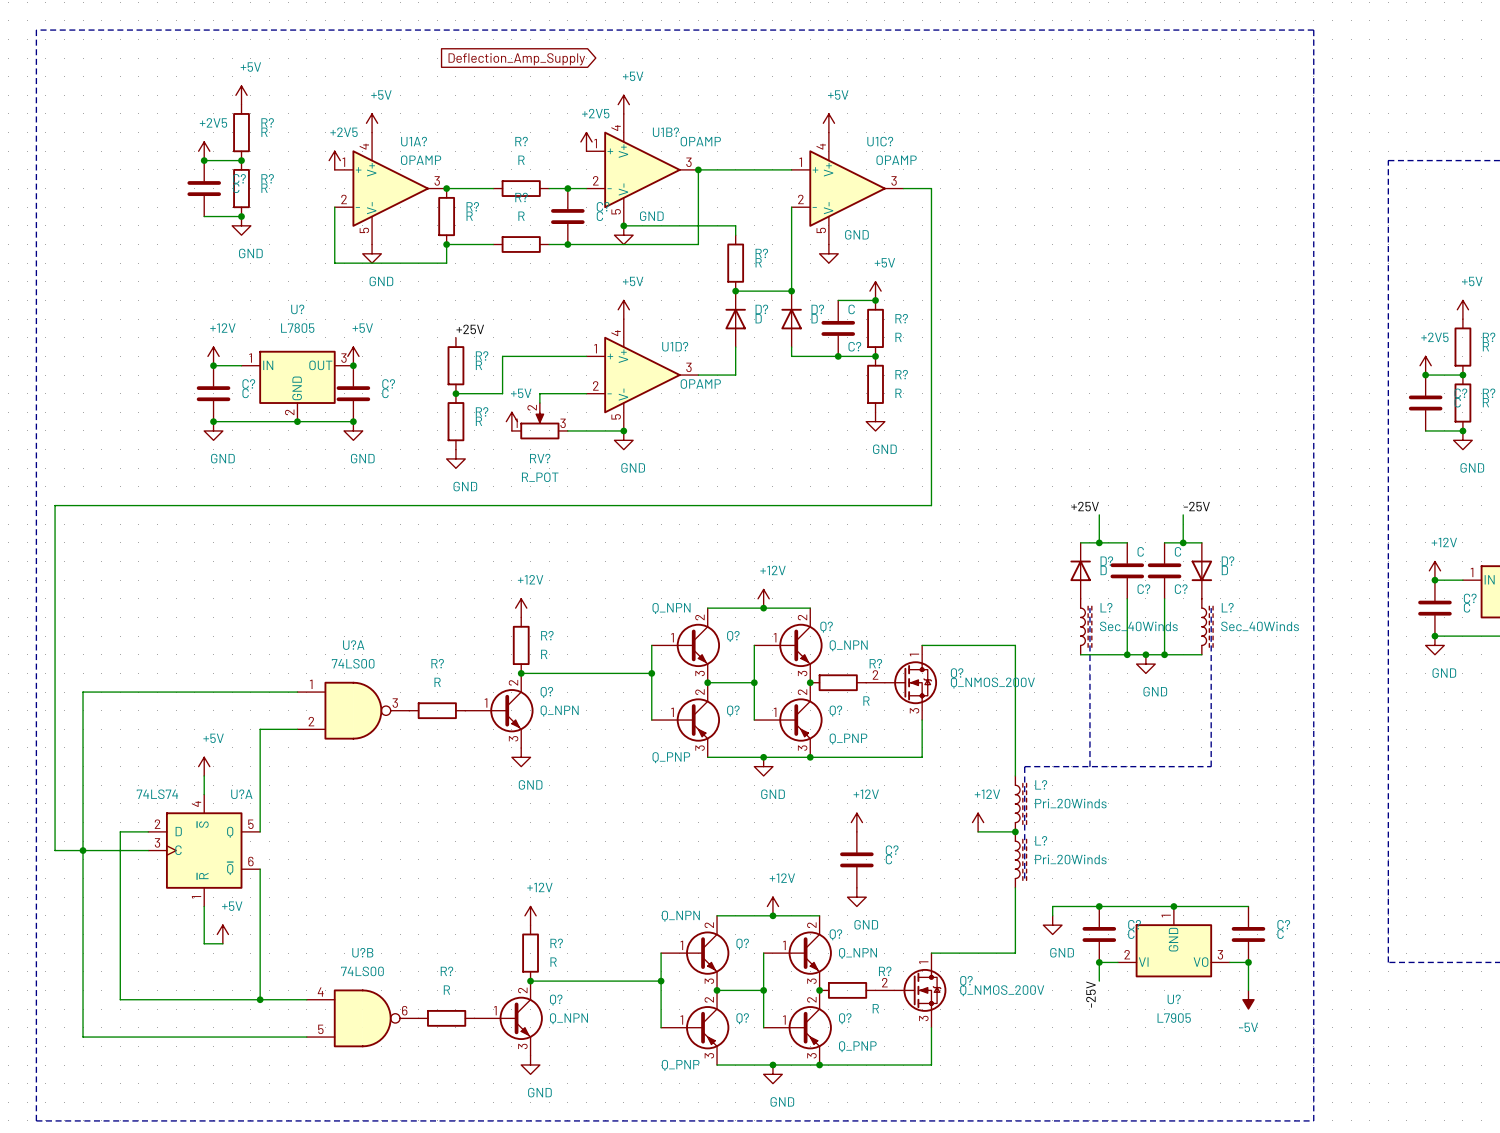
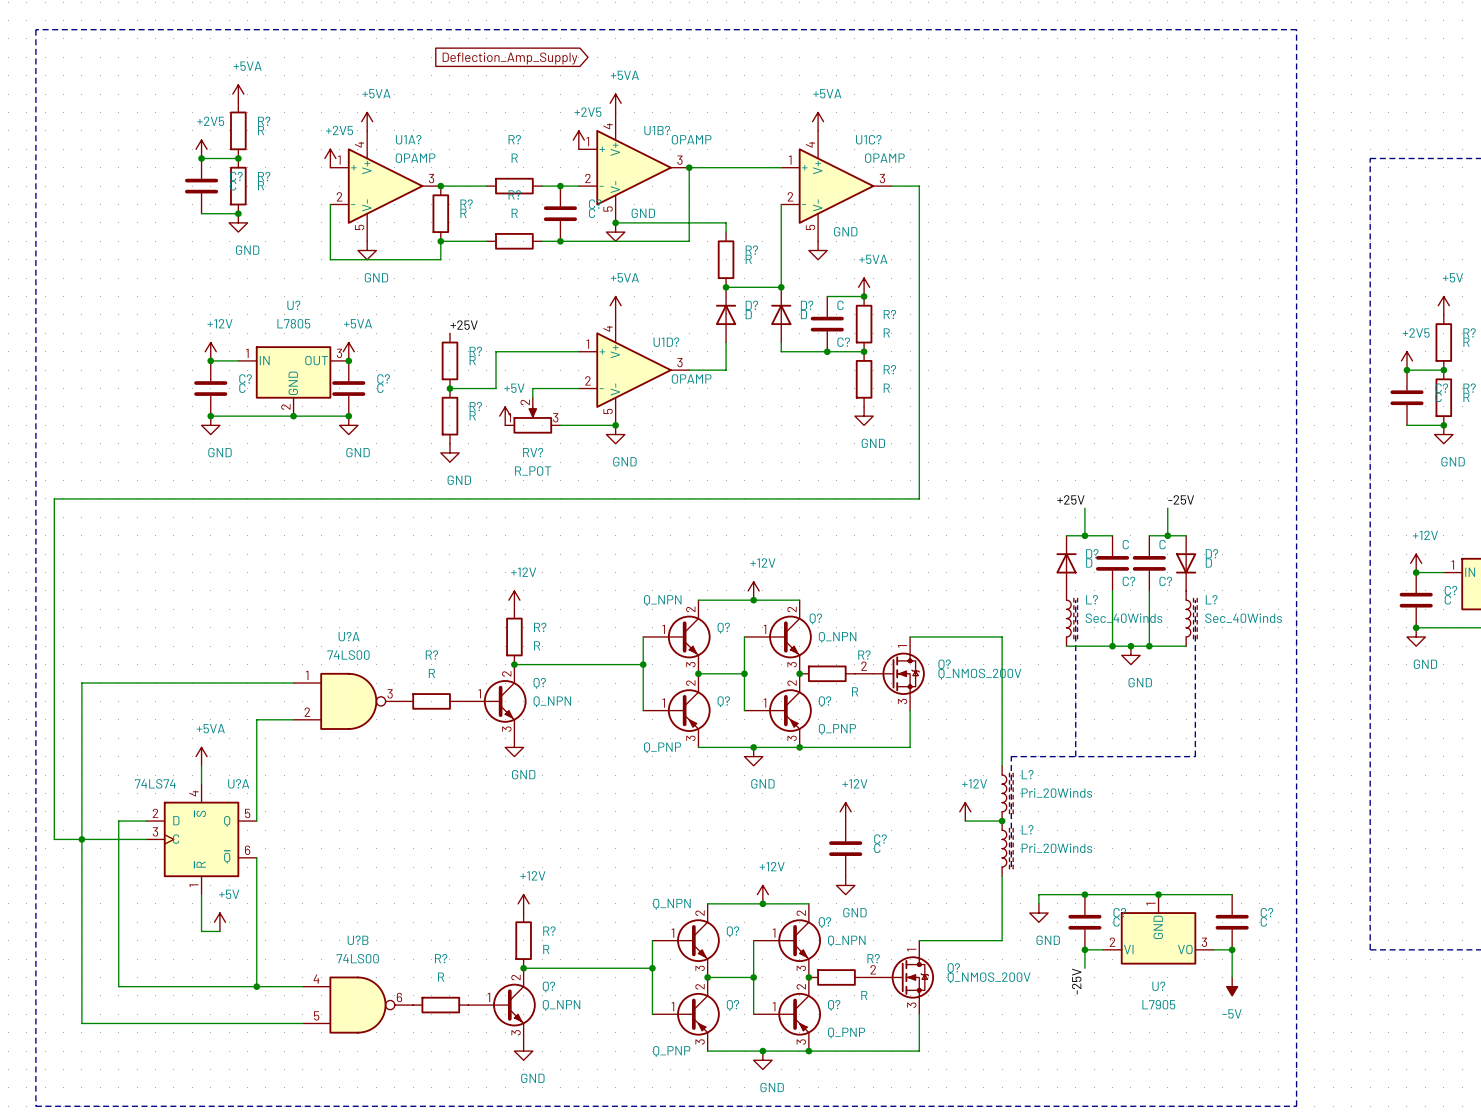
power symbol: +5V (241, 95) -> +5VA (238, 94)
power symbol: +5V (623, 104) -> +5VA (615, 103)
power symbol: +5V (372, 123) -> +5VA (367, 121)
power symbol: +5V (828, 123) -> +5VA (818, 121)
power symbol: +5V (875, 291) -> +5VA (864, 287)
power symbol: +5V (623, 309) -> +5VA (615, 305)
power symbol: +5V (353, 356) -> +5VA (348, 351)
power symbol: +5V (204, 766) -> +5VA (201, 756)

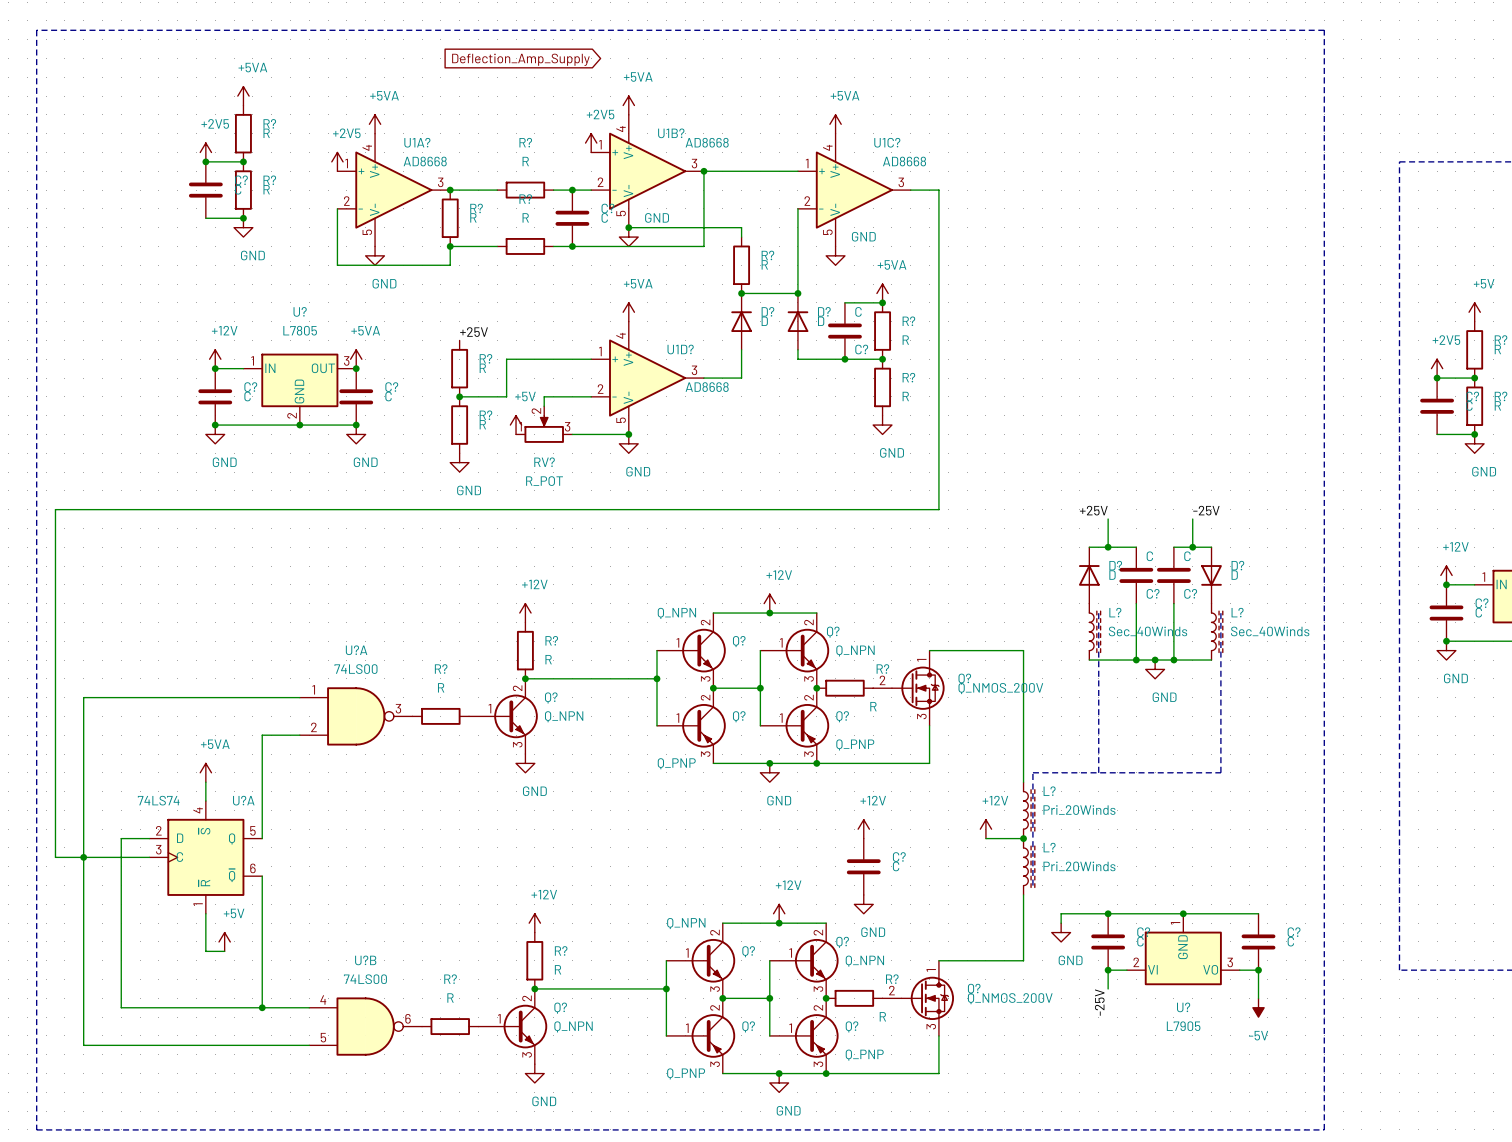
U1B? value: OPAMP (691, 139) -> AD8668 (707, 142)
U1A? value: OPAMP (415, 158) -> AD8668 (425, 161)
U1C? value: OPAMP (884, 158) -> AD8668 (904, 161)
U1D? value: OPAMP (691, 378) -> AD8668 (707, 387)

